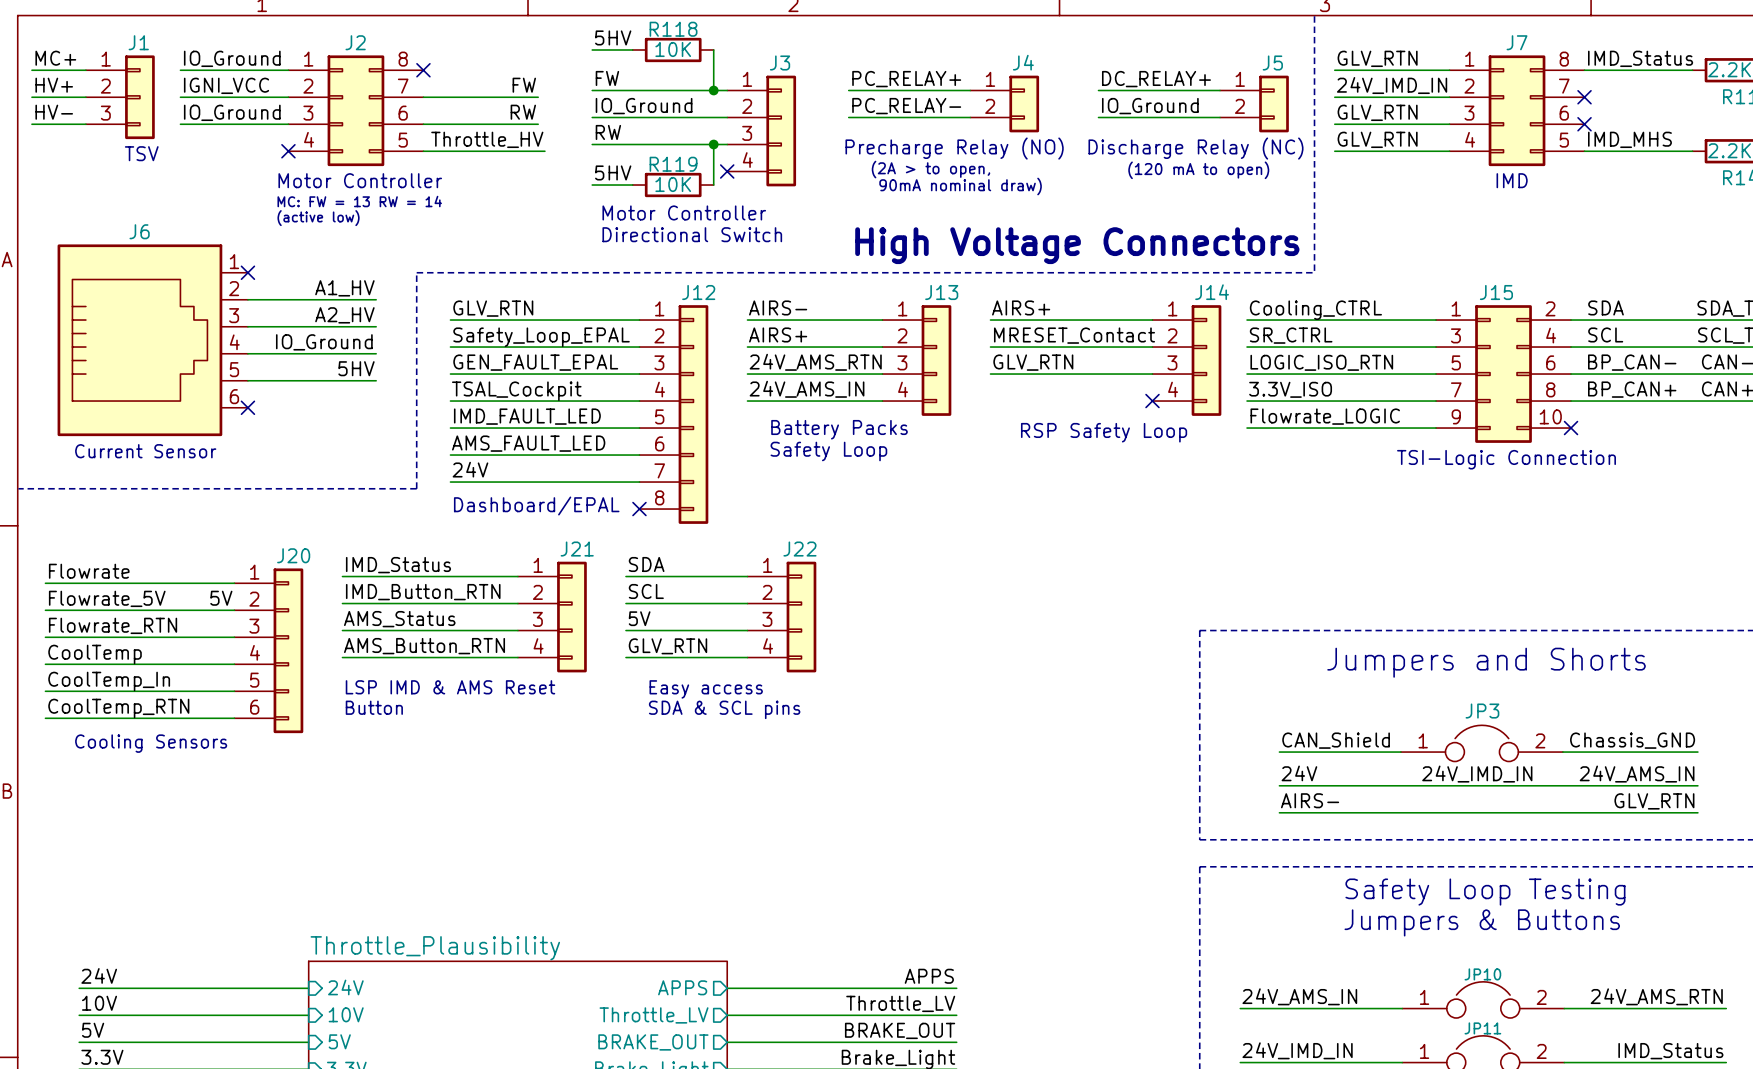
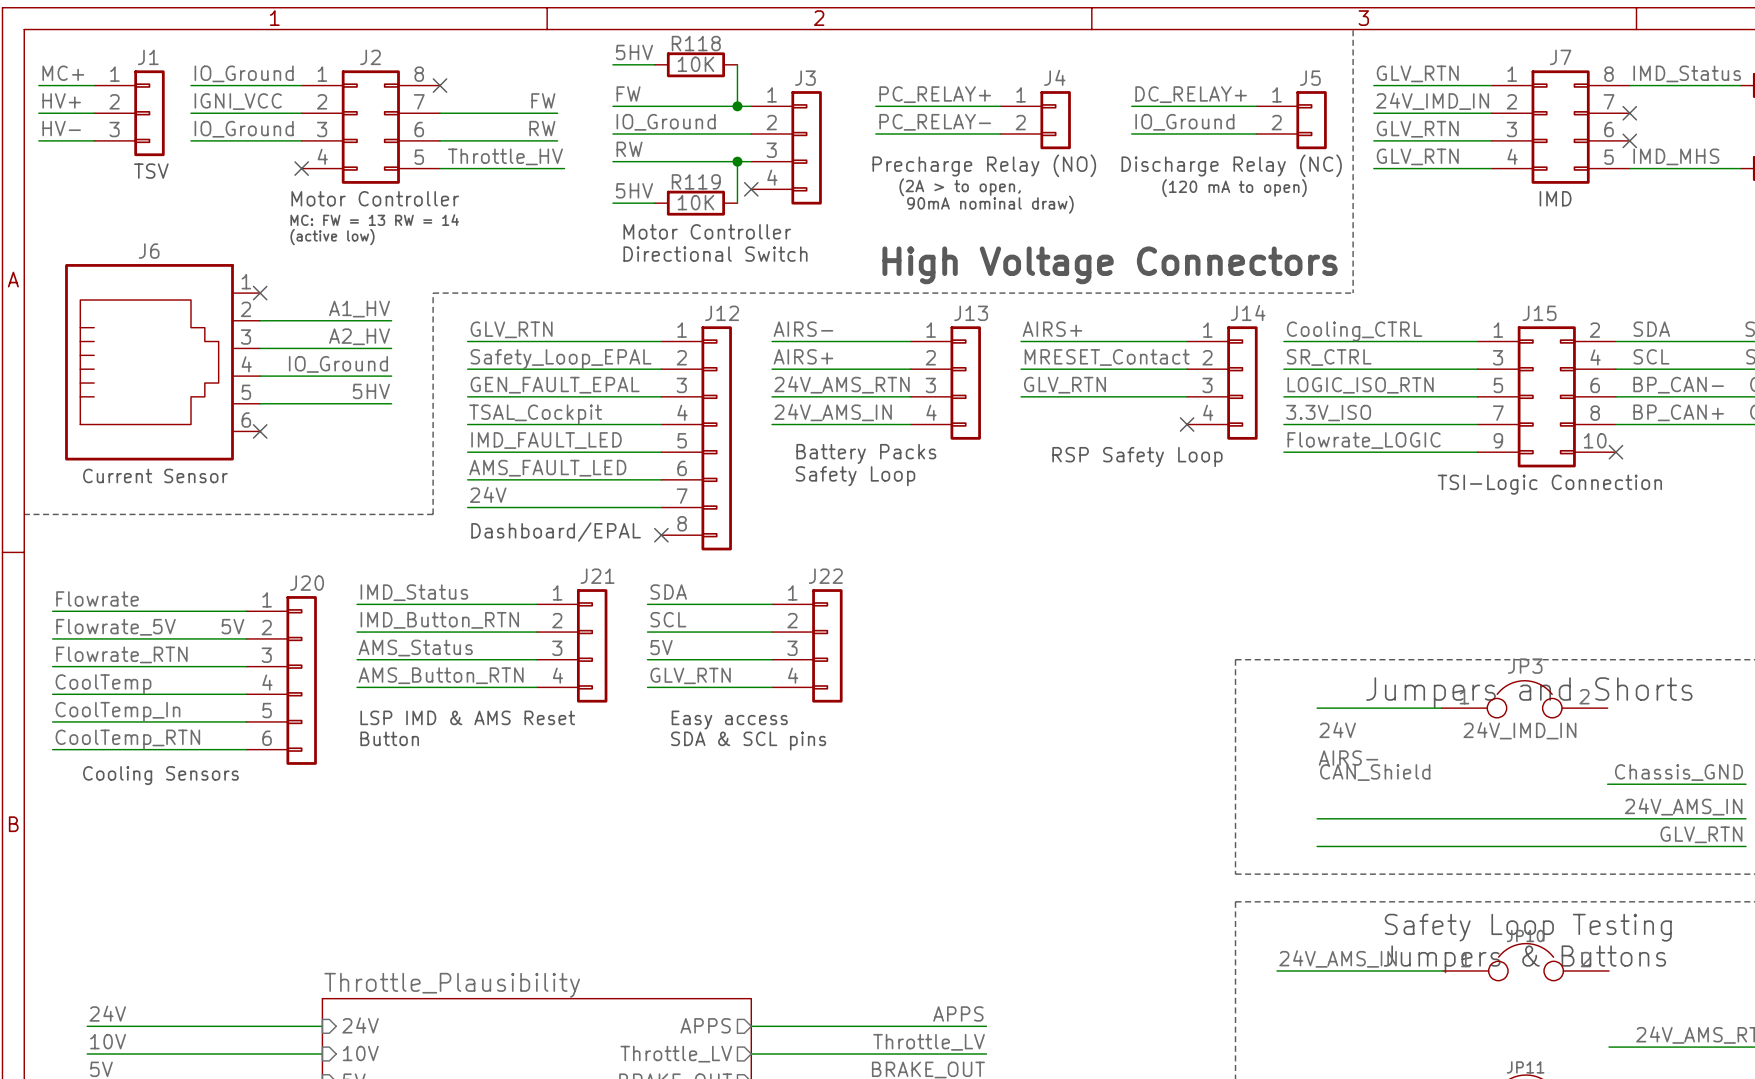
JP3 position: (1481, 743) -> (1524, 699)
wire: (1279, 752) (1400, 752) -> (1317, 708) (1441, 708)
label position: 24V (1299, 773) -> 24V (1337, 730)
label position: 24V_IMD_IN (1477, 774) -> 24V_IMD_IN (1519, 730)
label position: AIRS- (1310, 800) -> AIRS- (1348, 758)
label position: 24V_AMS_IN (1299, 996) -> 24V_AMS_IN (1338, 958)
JP10 position: (1483, 999) -> (1526, 962)
wire: (1240, 1008) (1402, 1008) -> (1277, 970) (1443, 970)

